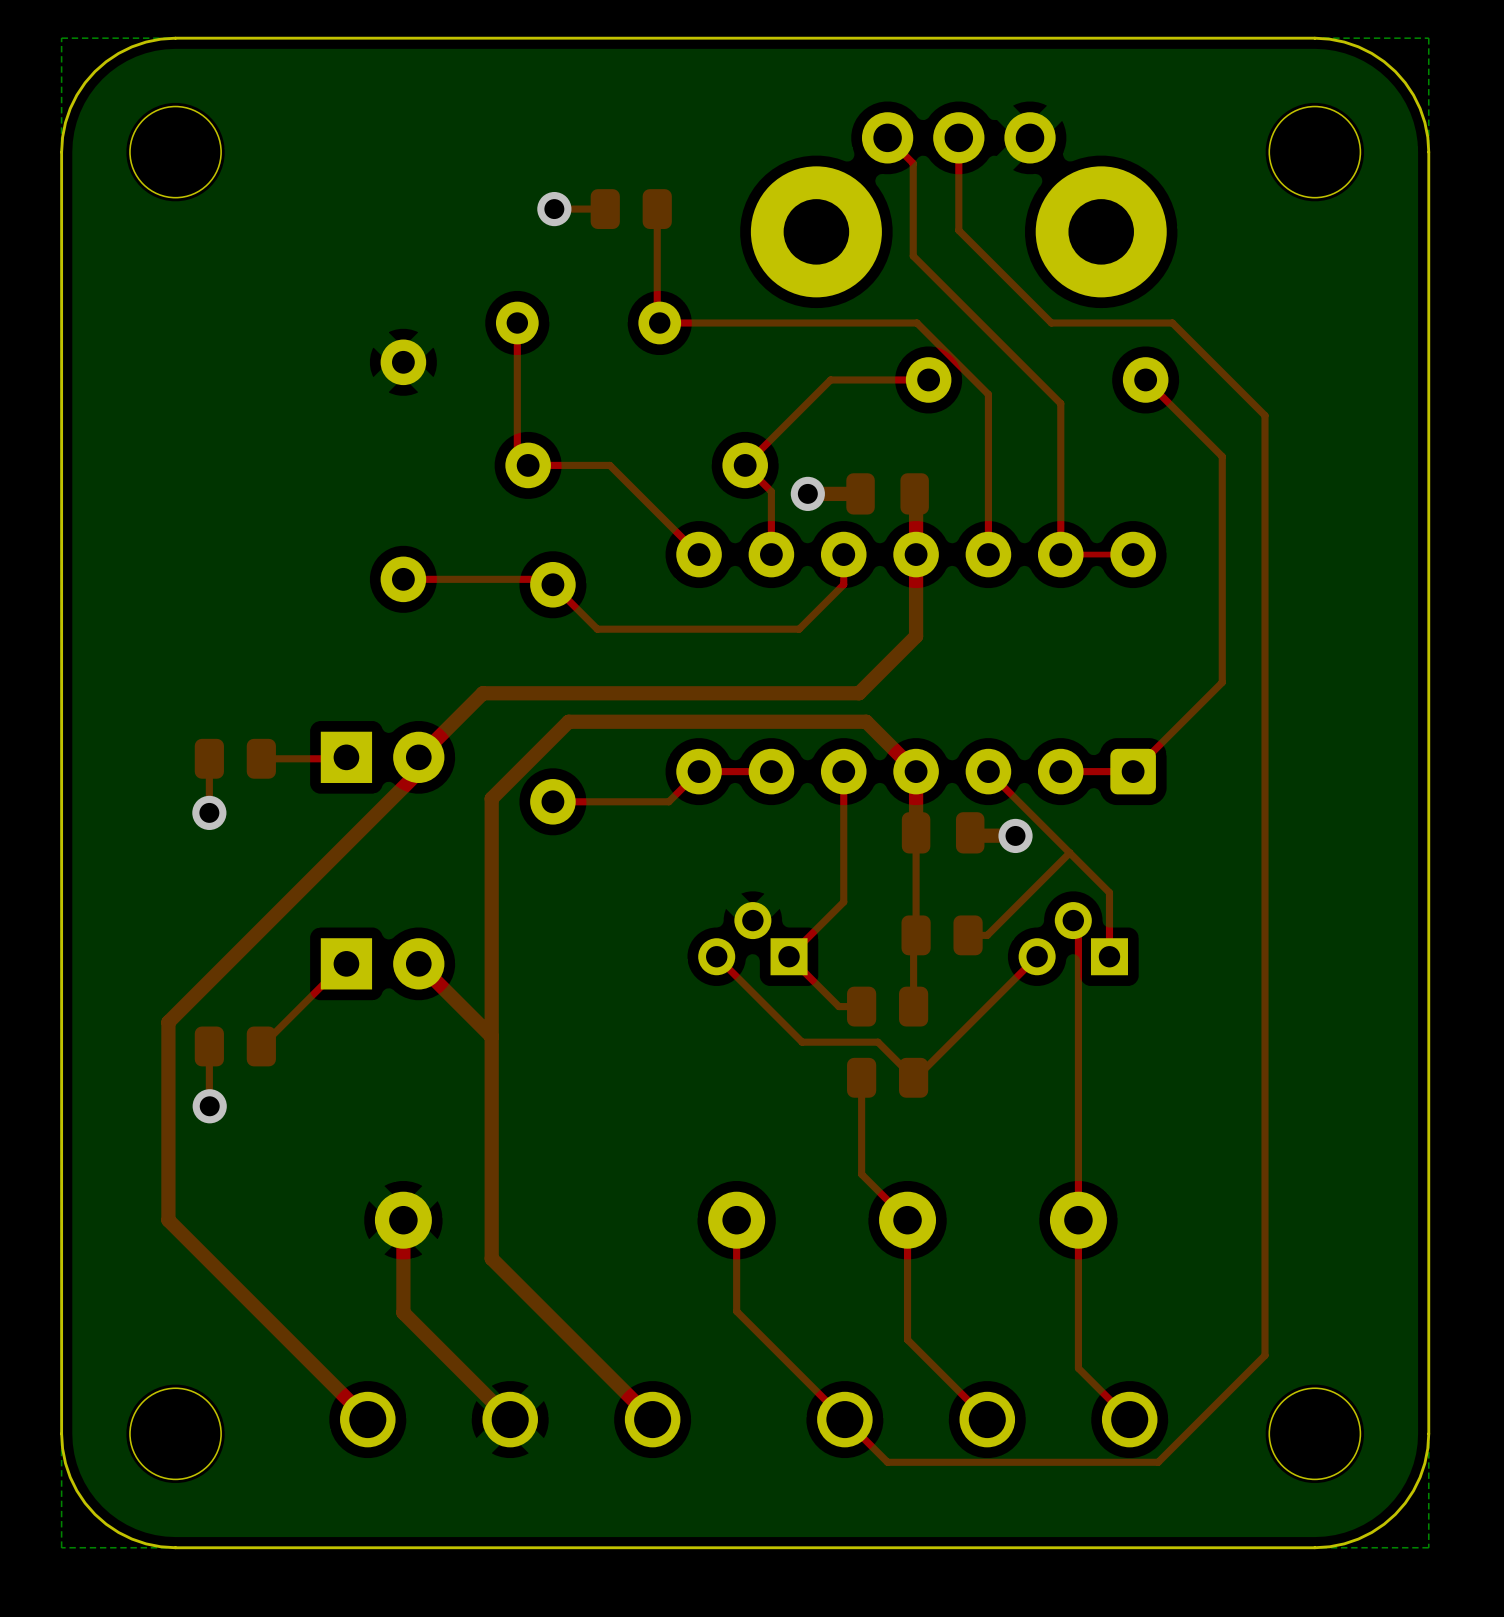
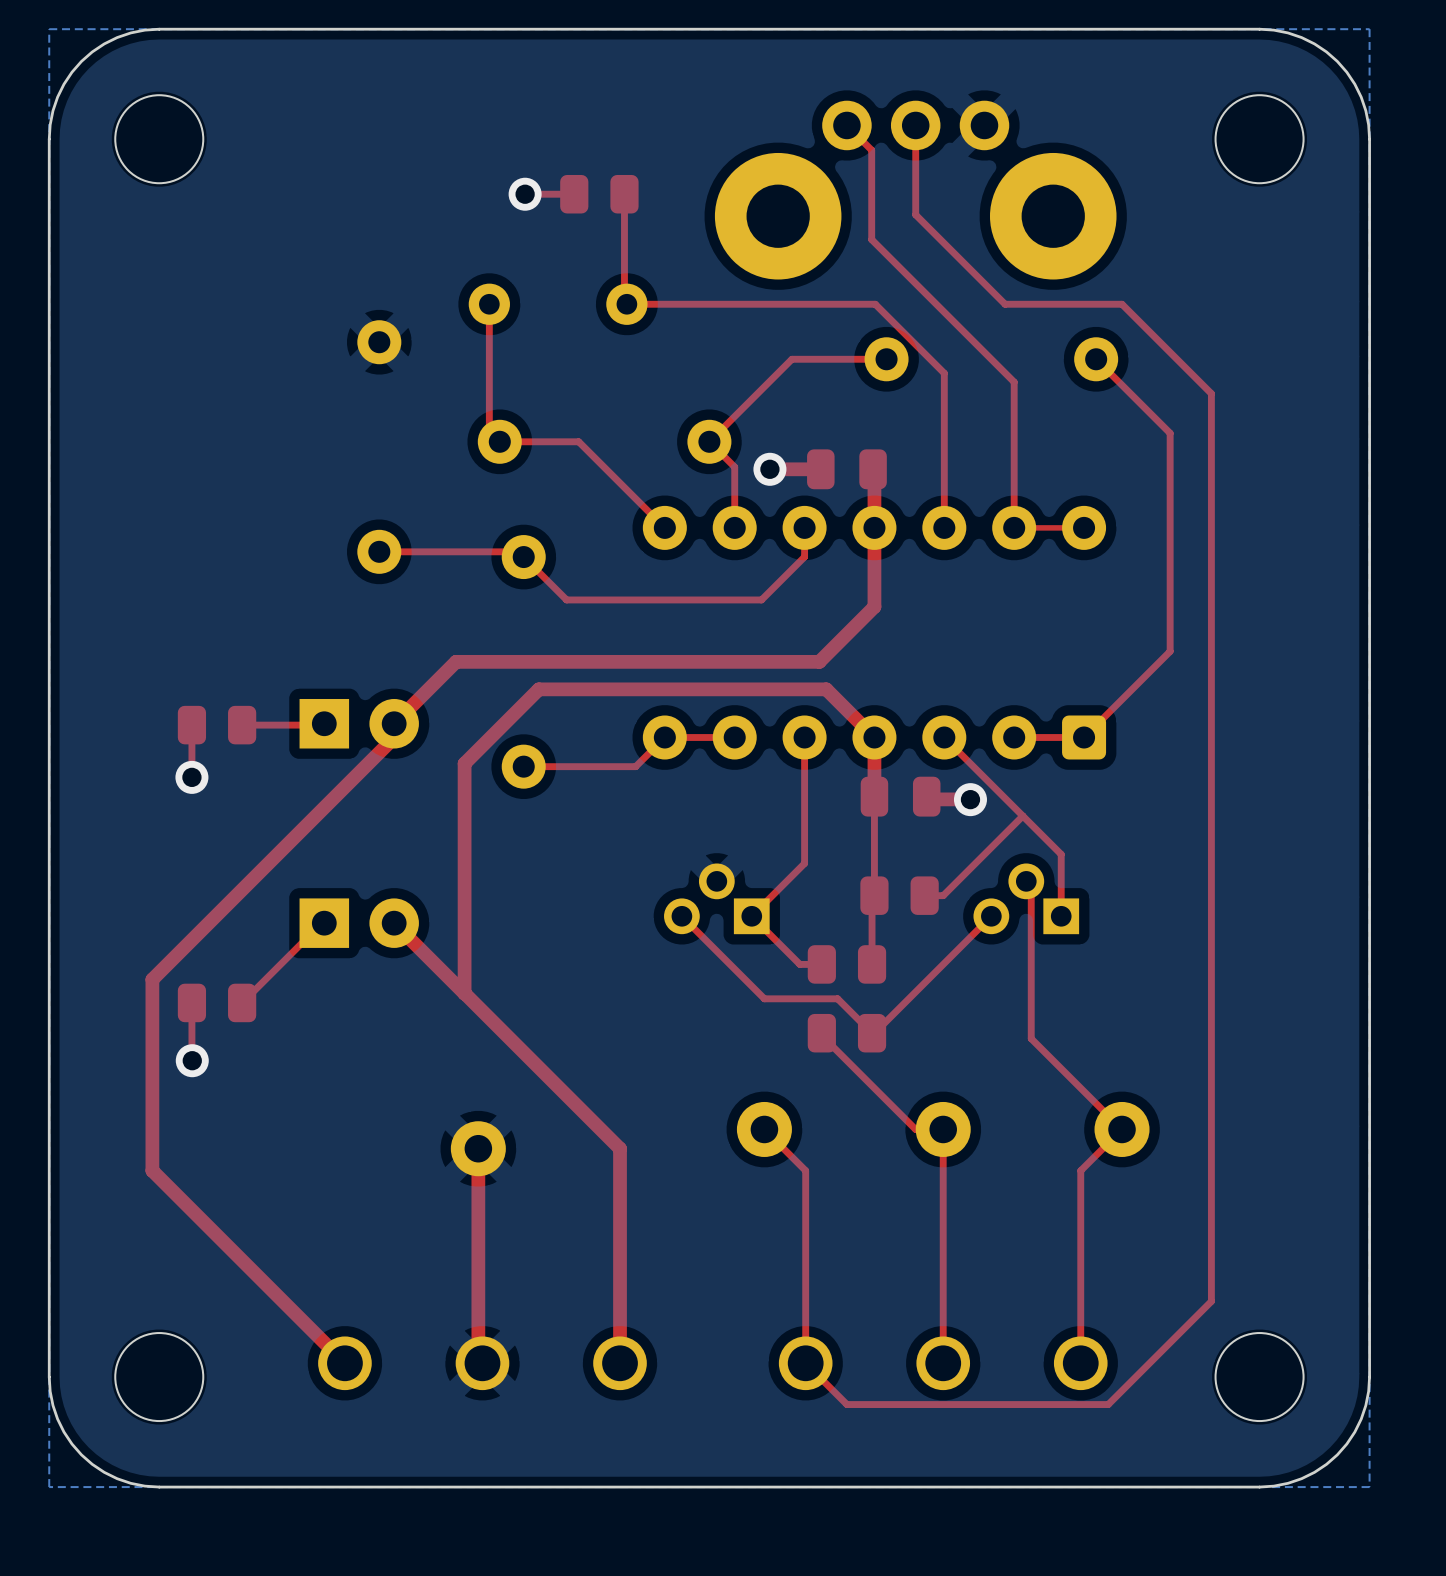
top track: (491, 1036) (491, 1258) (652, 1419) -> (464, 993) (620, 1148) (620, 1363)
top track: (861, 1080) (861, 1174) (907, 1220) (907, 1339) (987, 1419) -> (821, 1035) (915, 1129) (943, 1129) (943, 1363)
top track: (1078, 1083) (1078, 1368) (1129, 1419) -> (1031, 1038) (1122, 1129) (1080, 1170) (1080, 1363)
part: none -> (764, 1129)
part: none -> (943, 1129)
part: none -> (1122, 1129)
top track: (403, 1220) (403, 1312) (505, 1415) -> (478, 1148) (478, 1359)
part position: (403, 1220) -> (478, 1148)
top track: (736, 1220) (736, 1311) (844, 1419) -> (764, 1129) (805, 1170) (805, 1363)
part: (736, 1220) -> none
part: (907, 1220) -> none
part: (1078, 1220) -> none

